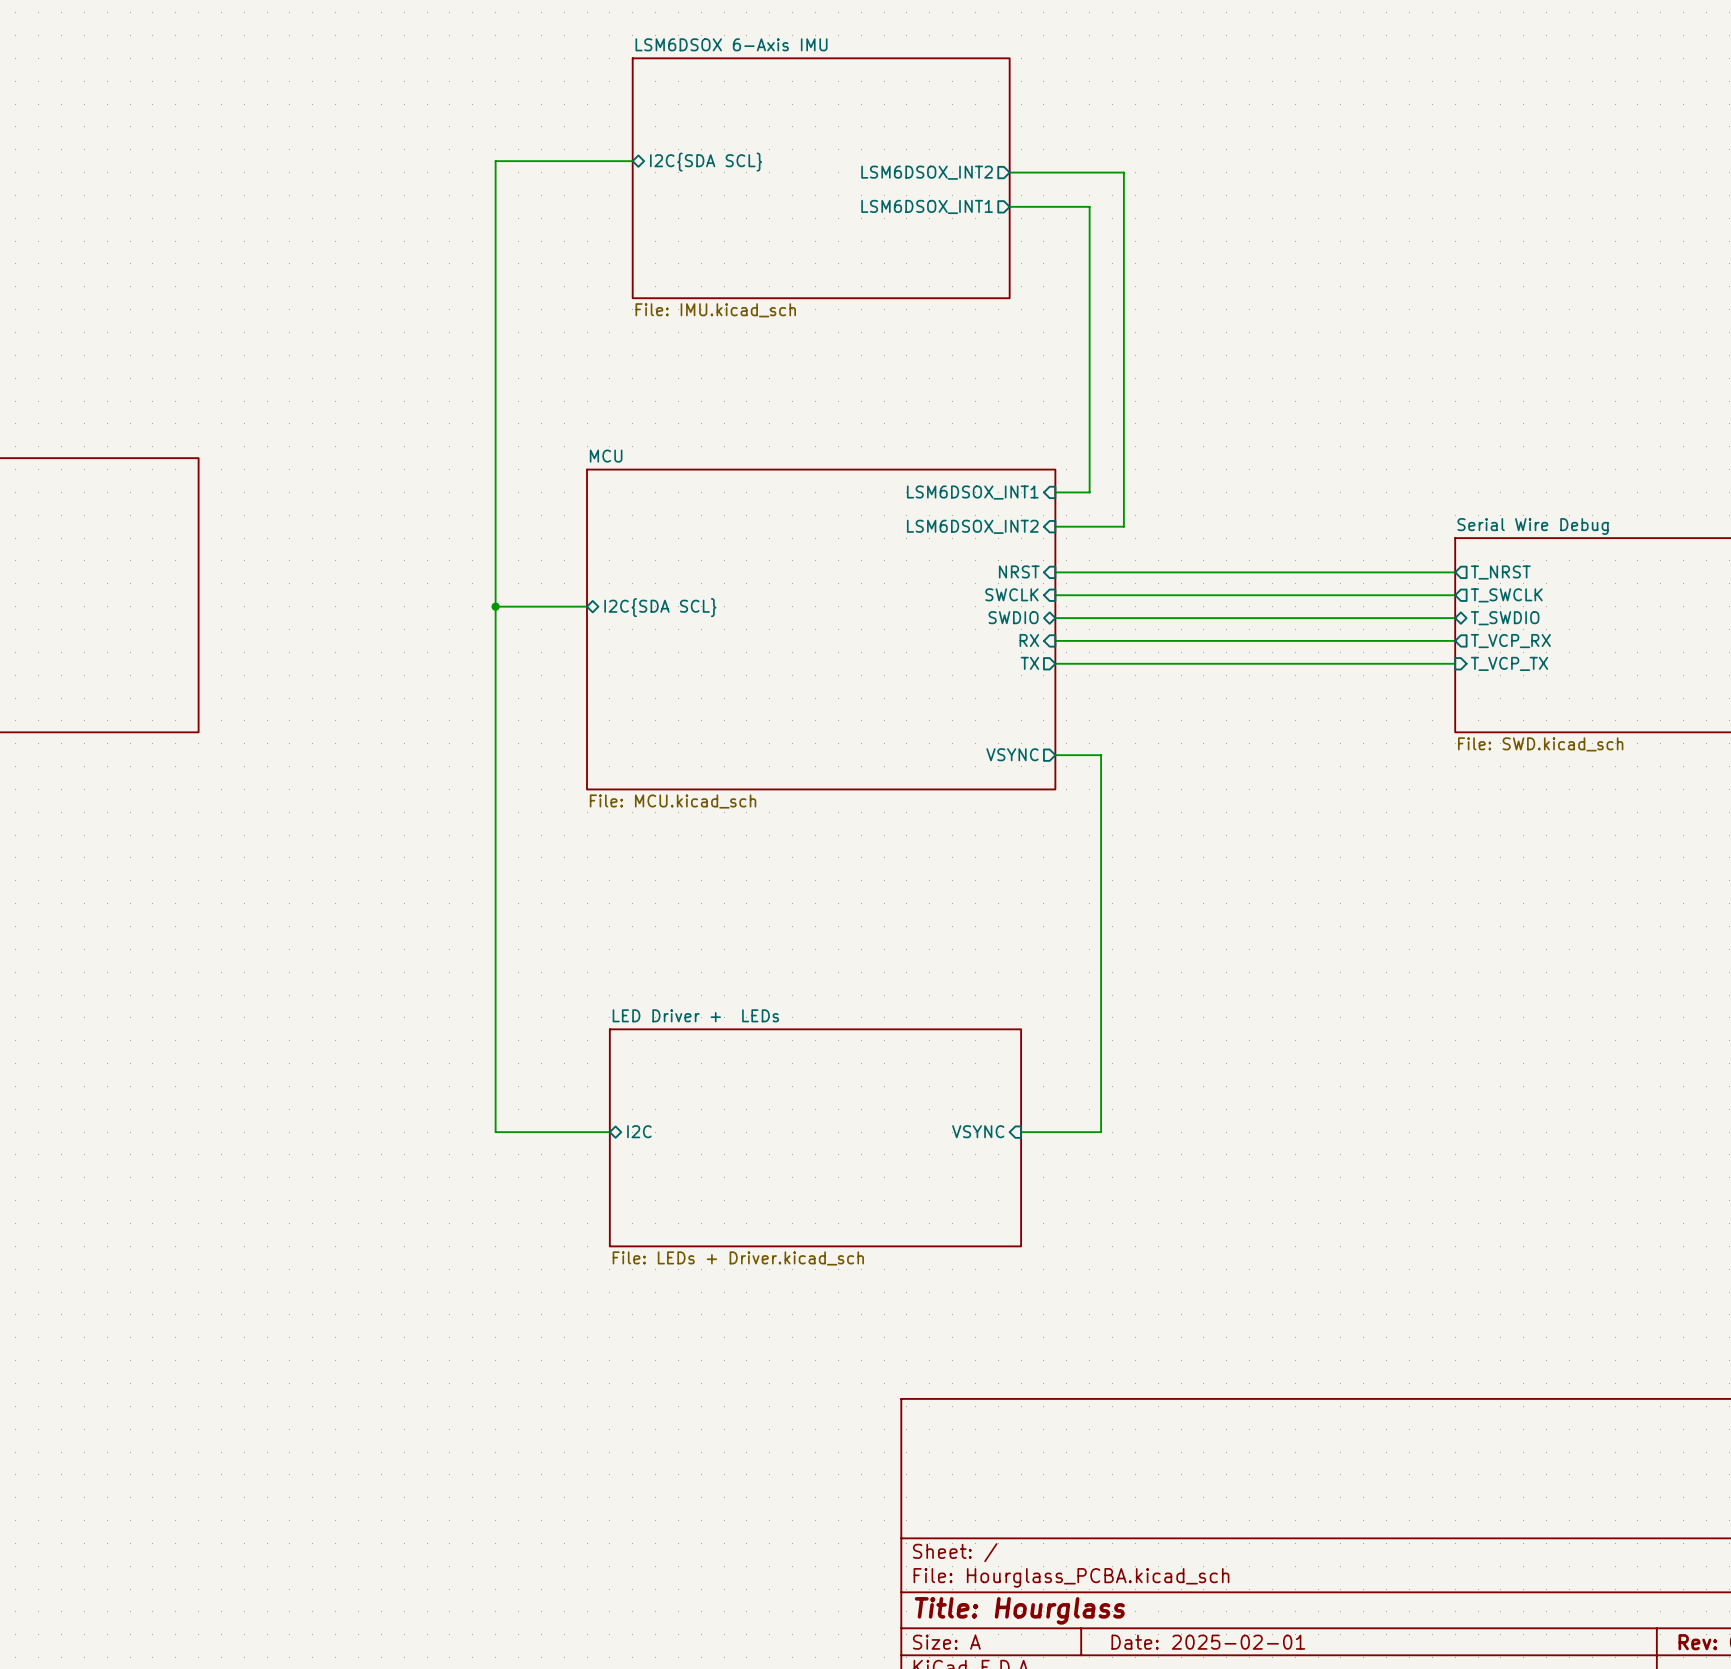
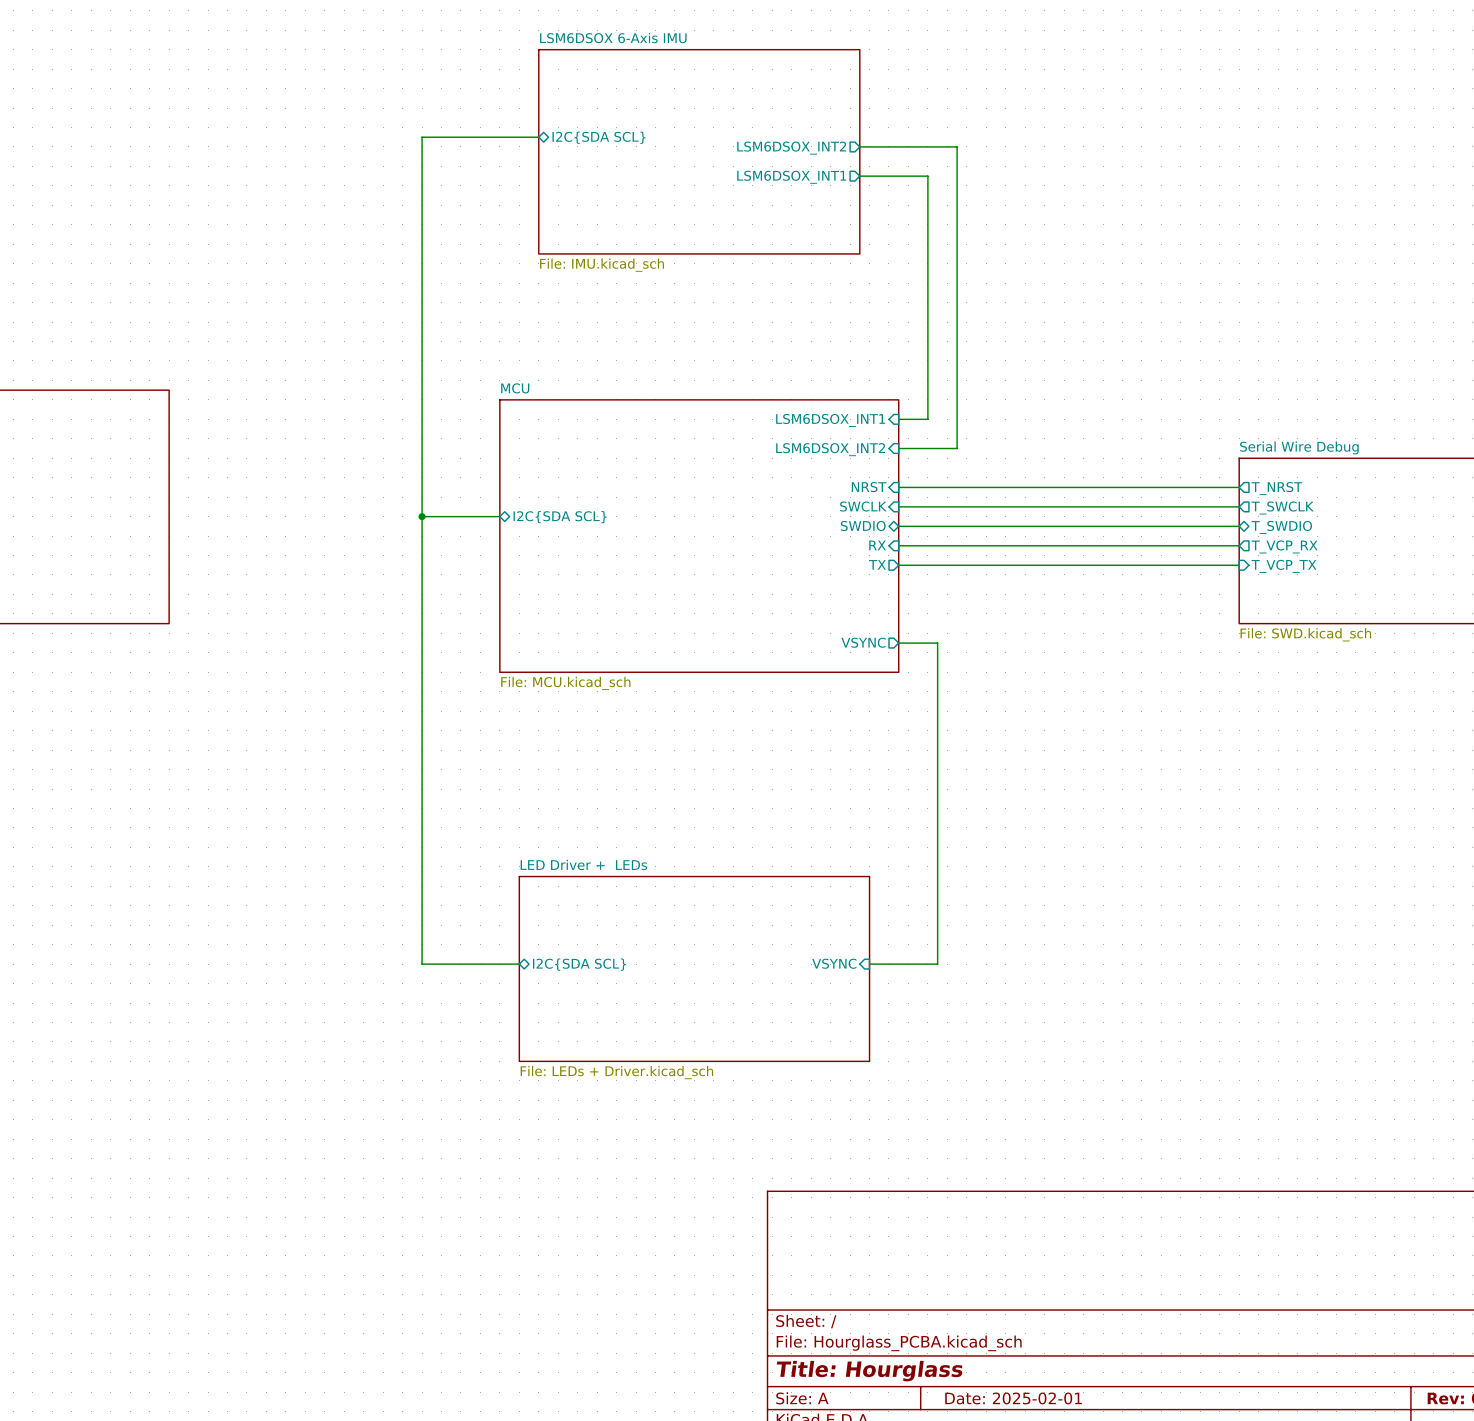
sheet pin: I2C (639, 1131) -> I2C{SDA SCL} (579, 964)

